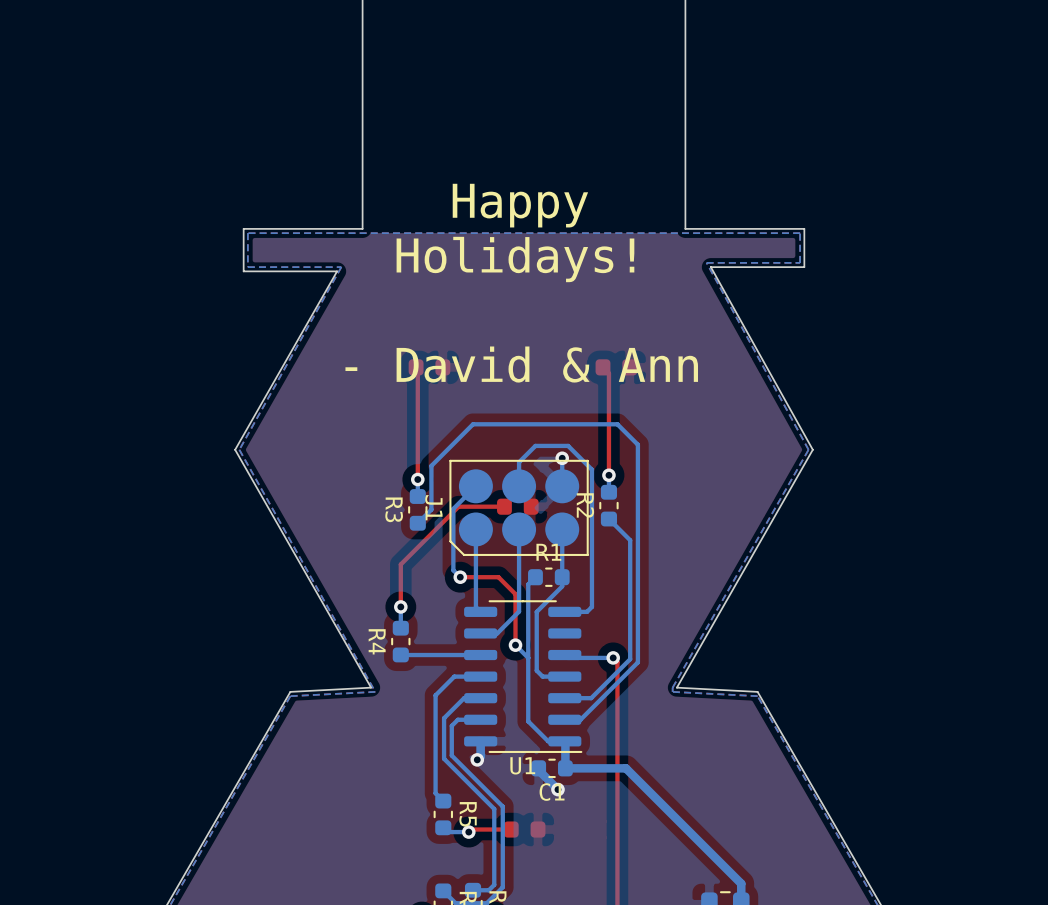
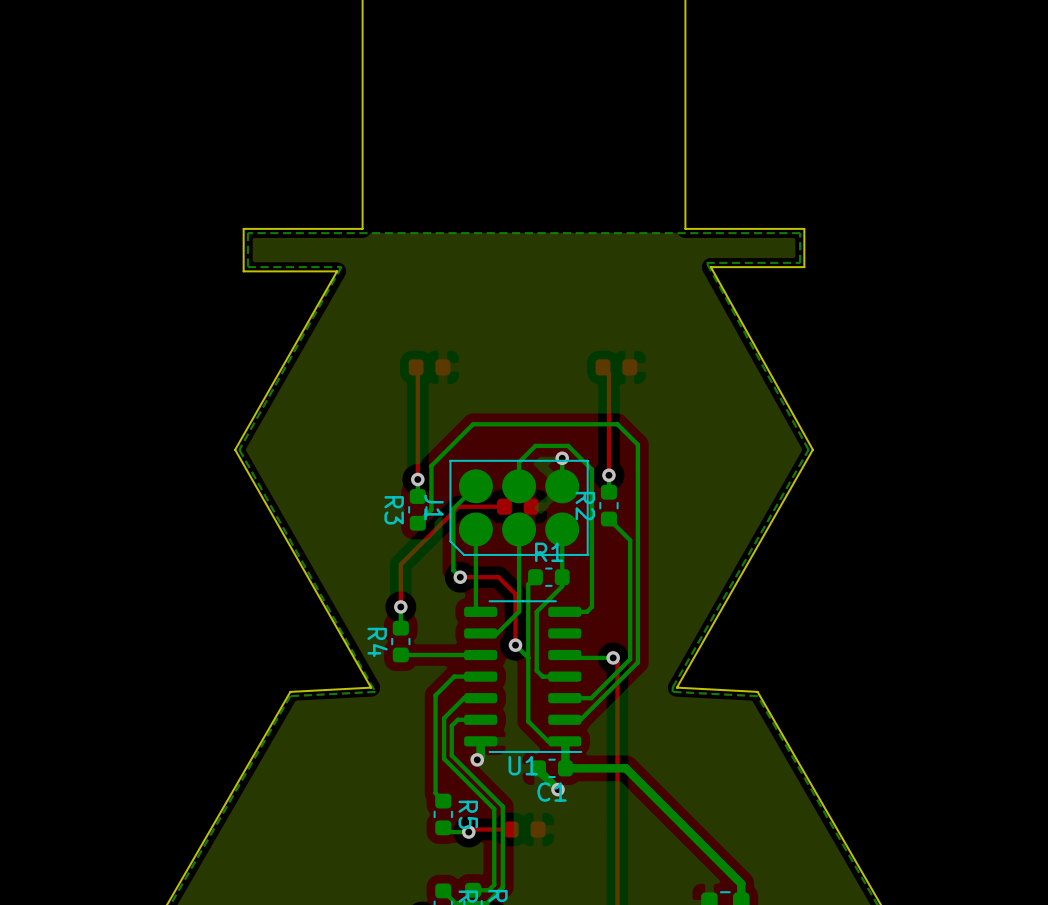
text: Happy (520, 205) -> none
text: Holidays! (515, 259) -> none
text: - David & Ann (521, 364) -> none

